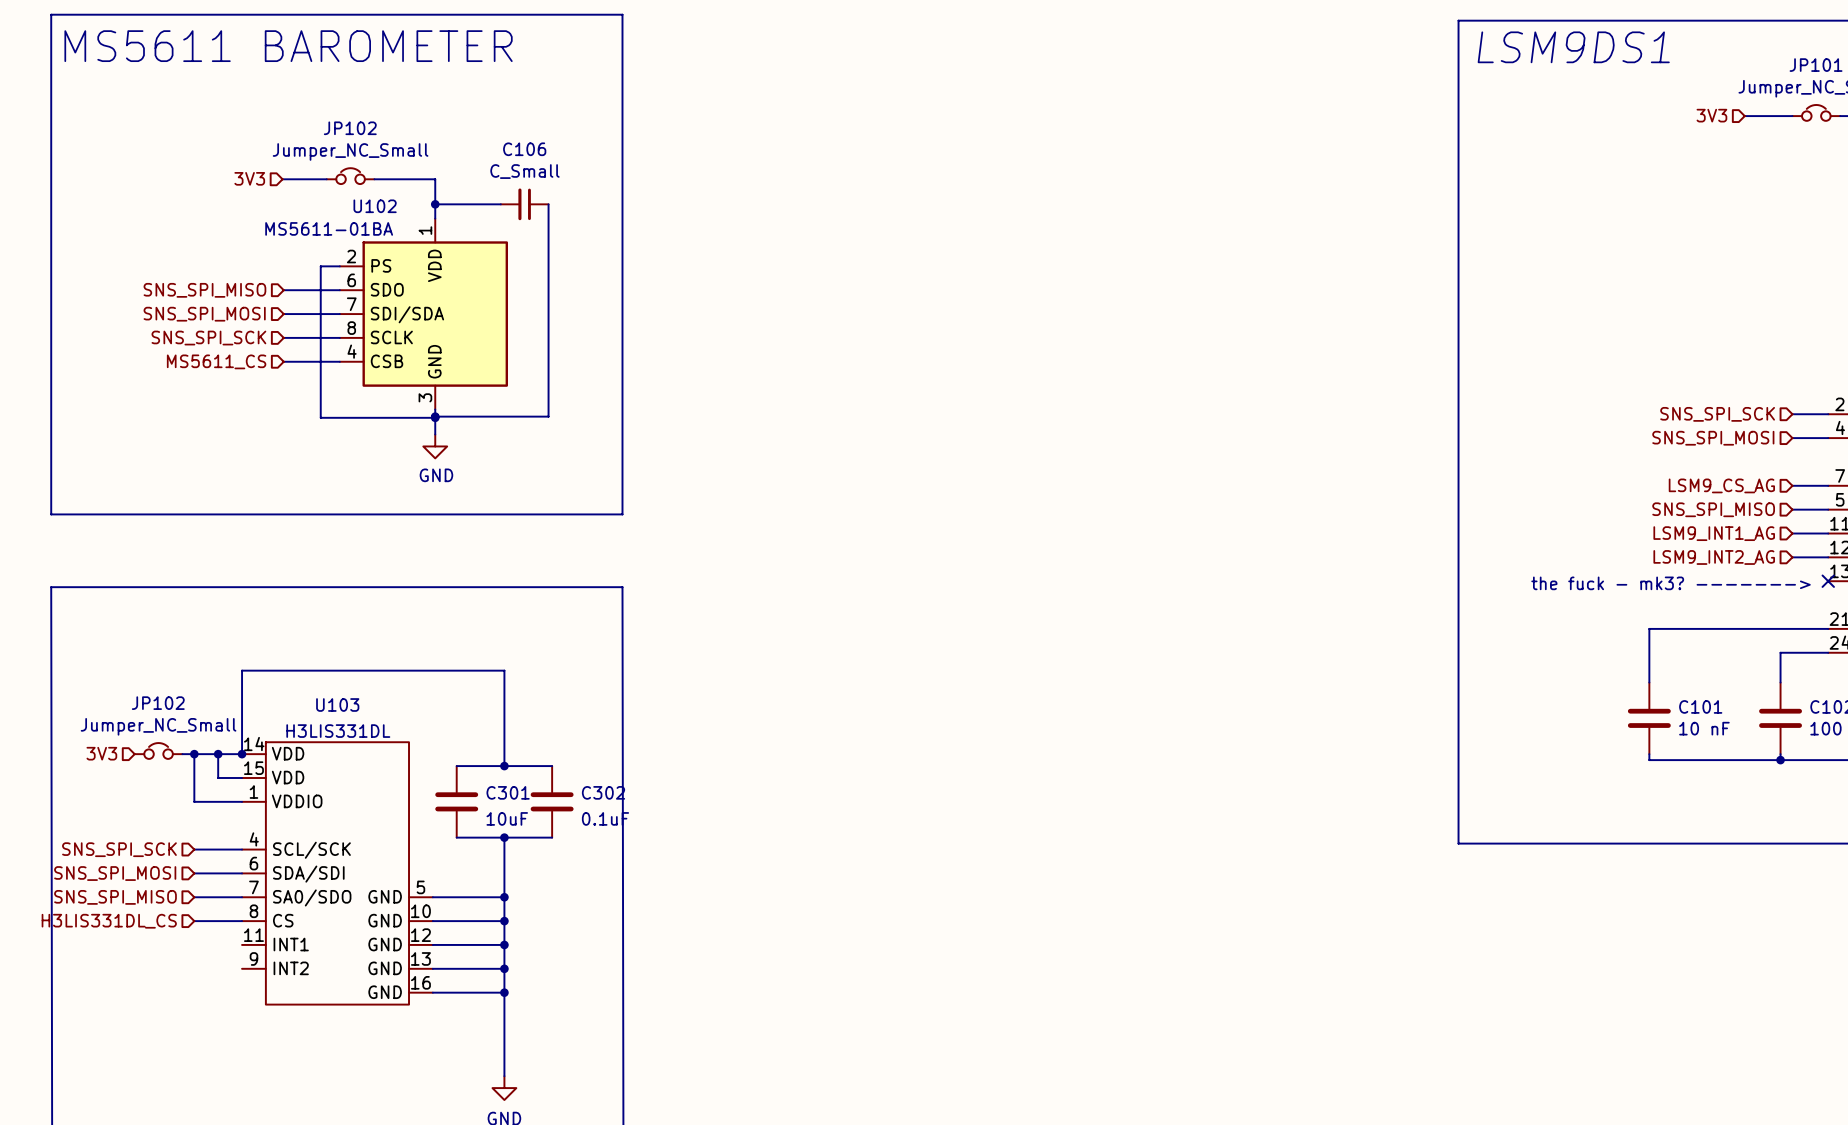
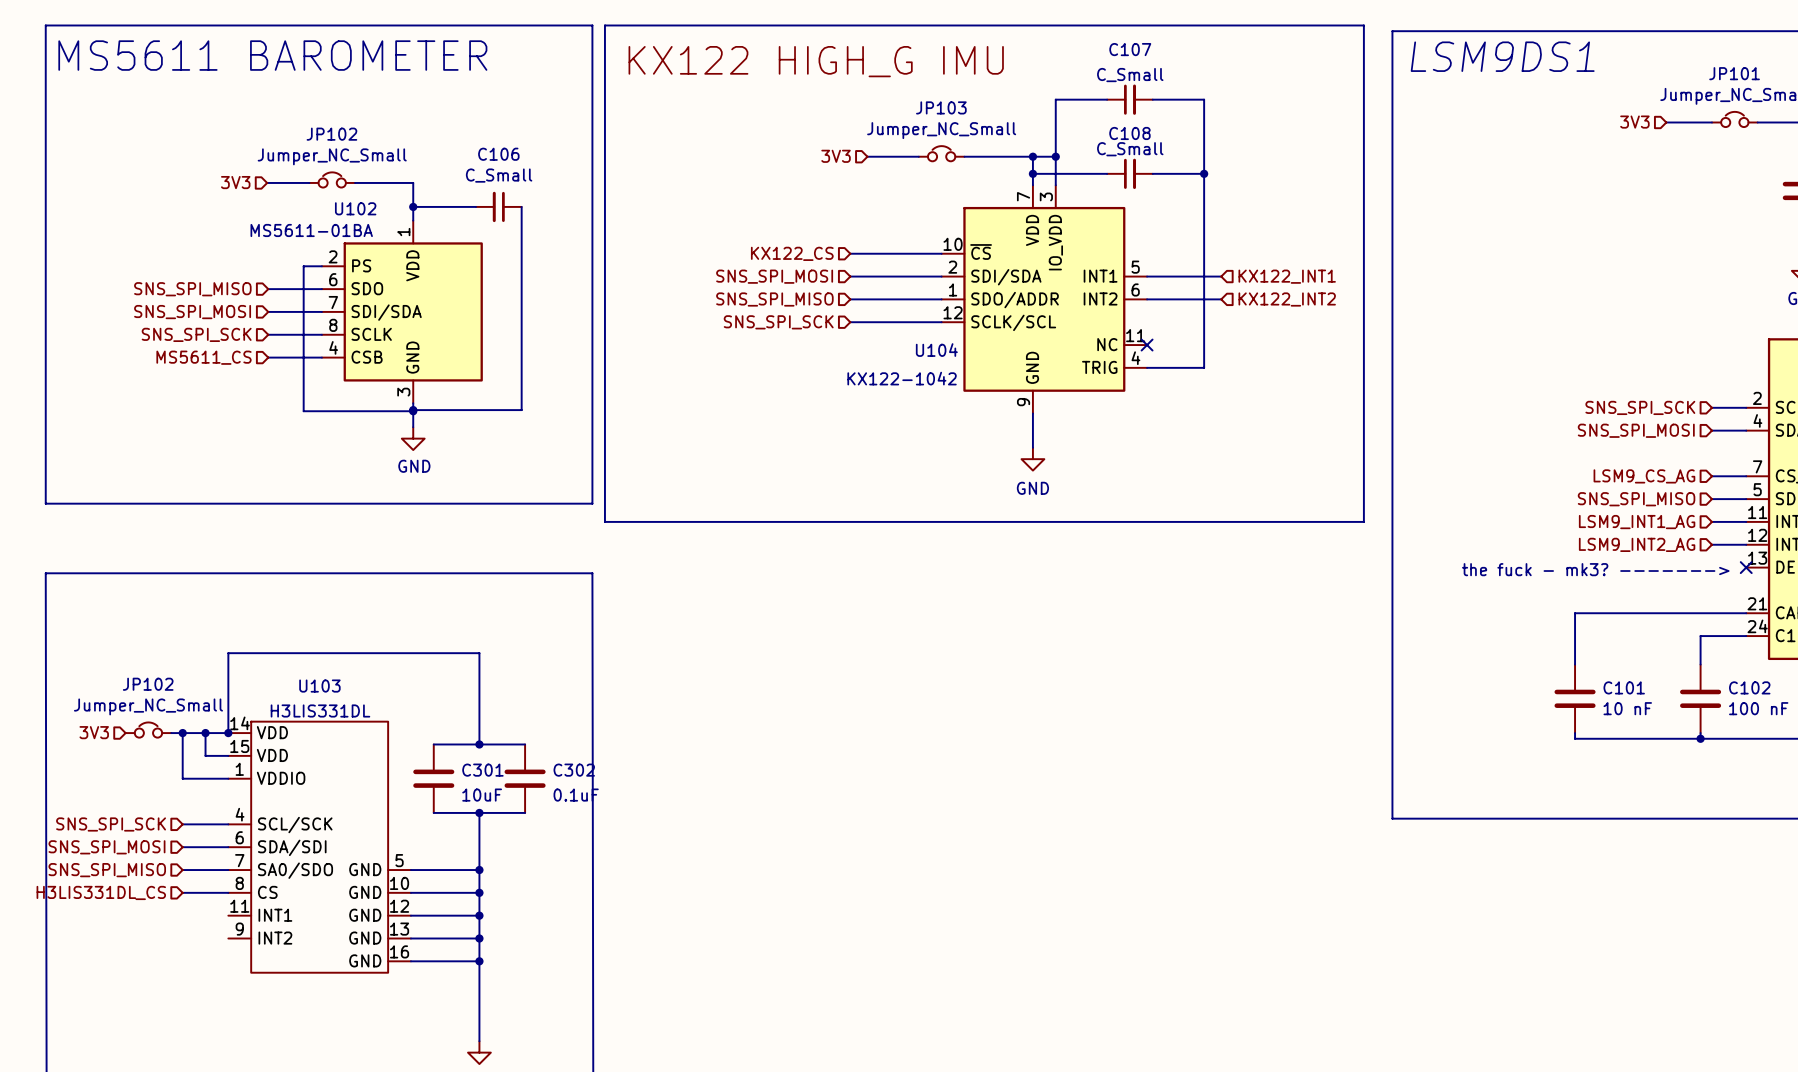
line: none -> (604, 25) (1363, 25) (1363, 521) (604, 521) (604, 25)
label: none -> KX122 HIGH_G IMU (816, 61)
wire: none -> (1107, 99) (1055, 99) (1055, 185)
C107: none -> C_Small (1129, 99)
wire: none -> (1152, 99) (1204, 99) (1204, 367) (1147, 367)
JP103: none -> Jumper_NC_Small (941, 153)
hierarchical label: none -> 3V3 (836, 156)
wire: none -> (867, 156) (918, 156)
wire: none -> (964, 156) (1055, 156)
wire: none -> (1032, 156) (1032, 185)
junction: none -> (1032, 156)
junction: none -> (1055, 156)
wire: none -> (1032, 173) (1107, 173)
junction: none -> (1032, 173)
C108: none -> C_Small (1129, 173)
wire: none -> (1152, 173) (1204, 173)
junction: none -> (1204, 173)
hierarchical label: none -> KX122_CS (792, 253)
wire: none -> (850, 253) (941, 253)
hierarchical label: none -> SNS_SPI_MOSI (774, 276)
wire: none -> (850, 276) (941, 276)
wire: none -> (1147, 276) (1221, 276)
hierarchical label: none -> KX122_INT1 (1287, 276)
wire: none -> (850, 299) (941, 299)
U104: none -> KX122-1042 (1044, 299)
wire: none -> (1147, 299) (1221, 299)
hierarchical label: none -> SNS_SPI_MISO (774, 299)
hierarchical label: none -> KX122_INT2 (1287, 299)
hierarchical label: none -> SNS_SPI_SCK (778, 322)
wire: none -> (850, 322) (941, 322)
no-connect mark: none -> (1147, 345)
wire: none -> (1032, 413) (1032, 447)
power symbol: none -> GND (1032, 459)

